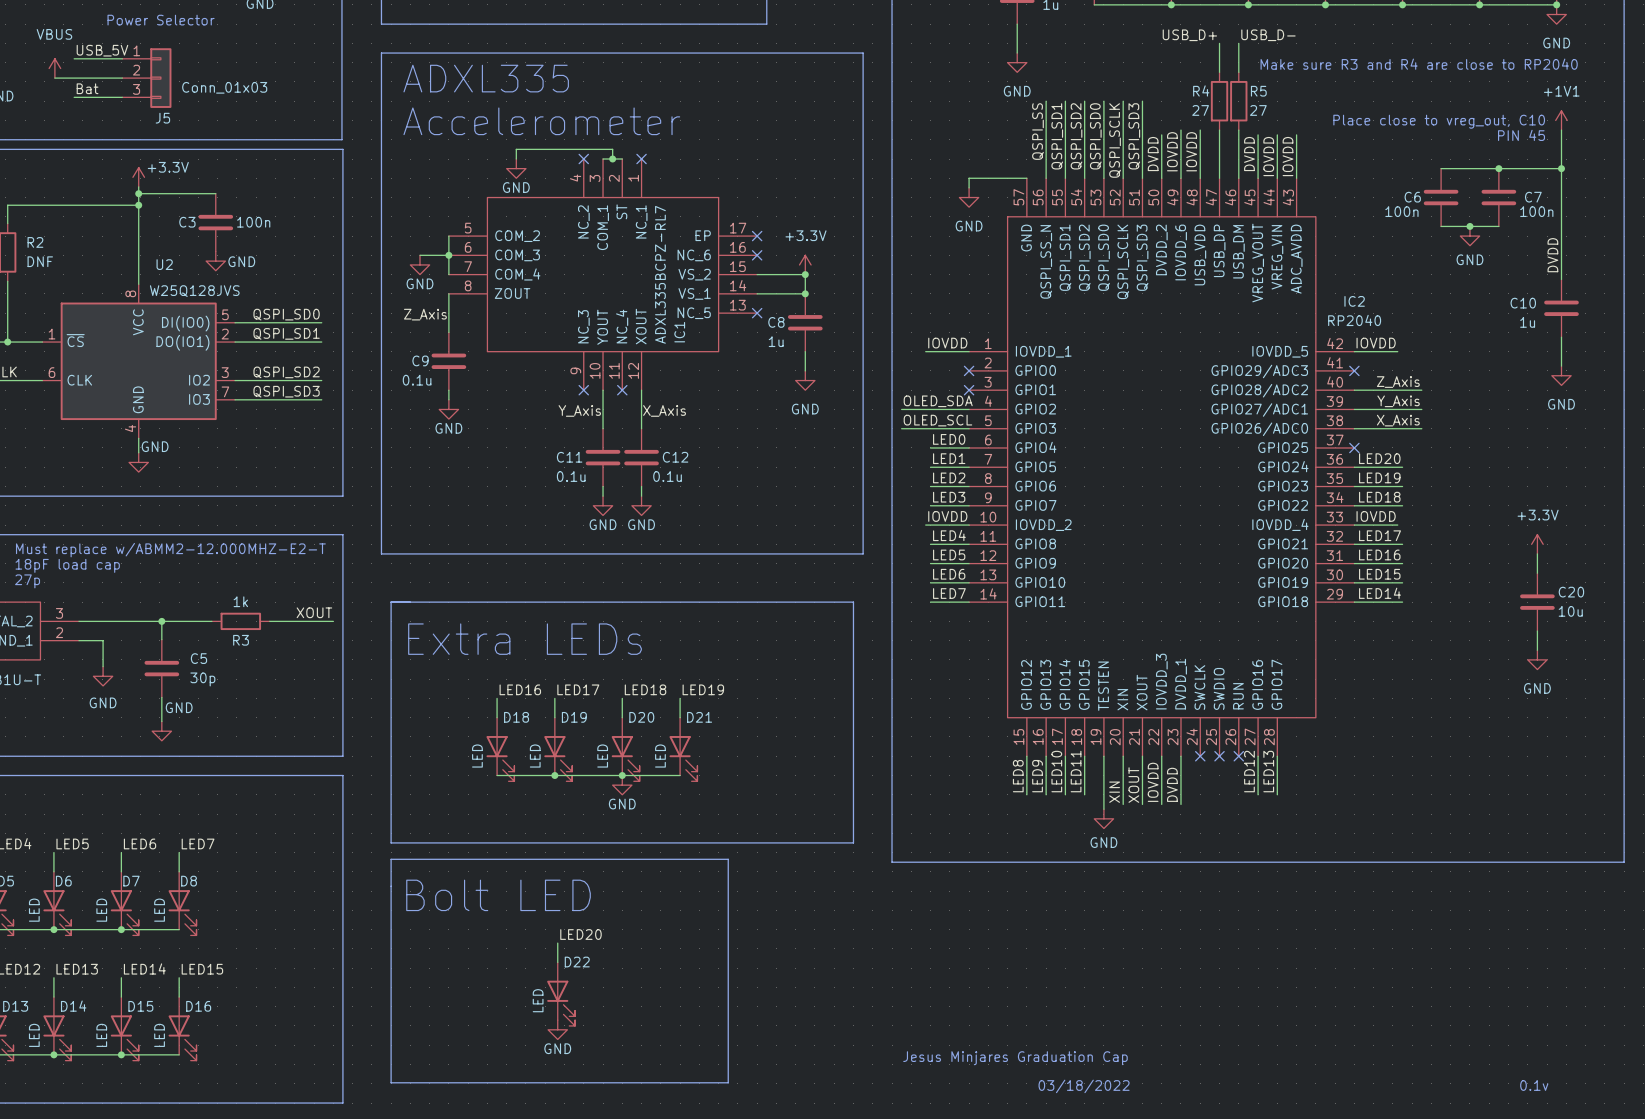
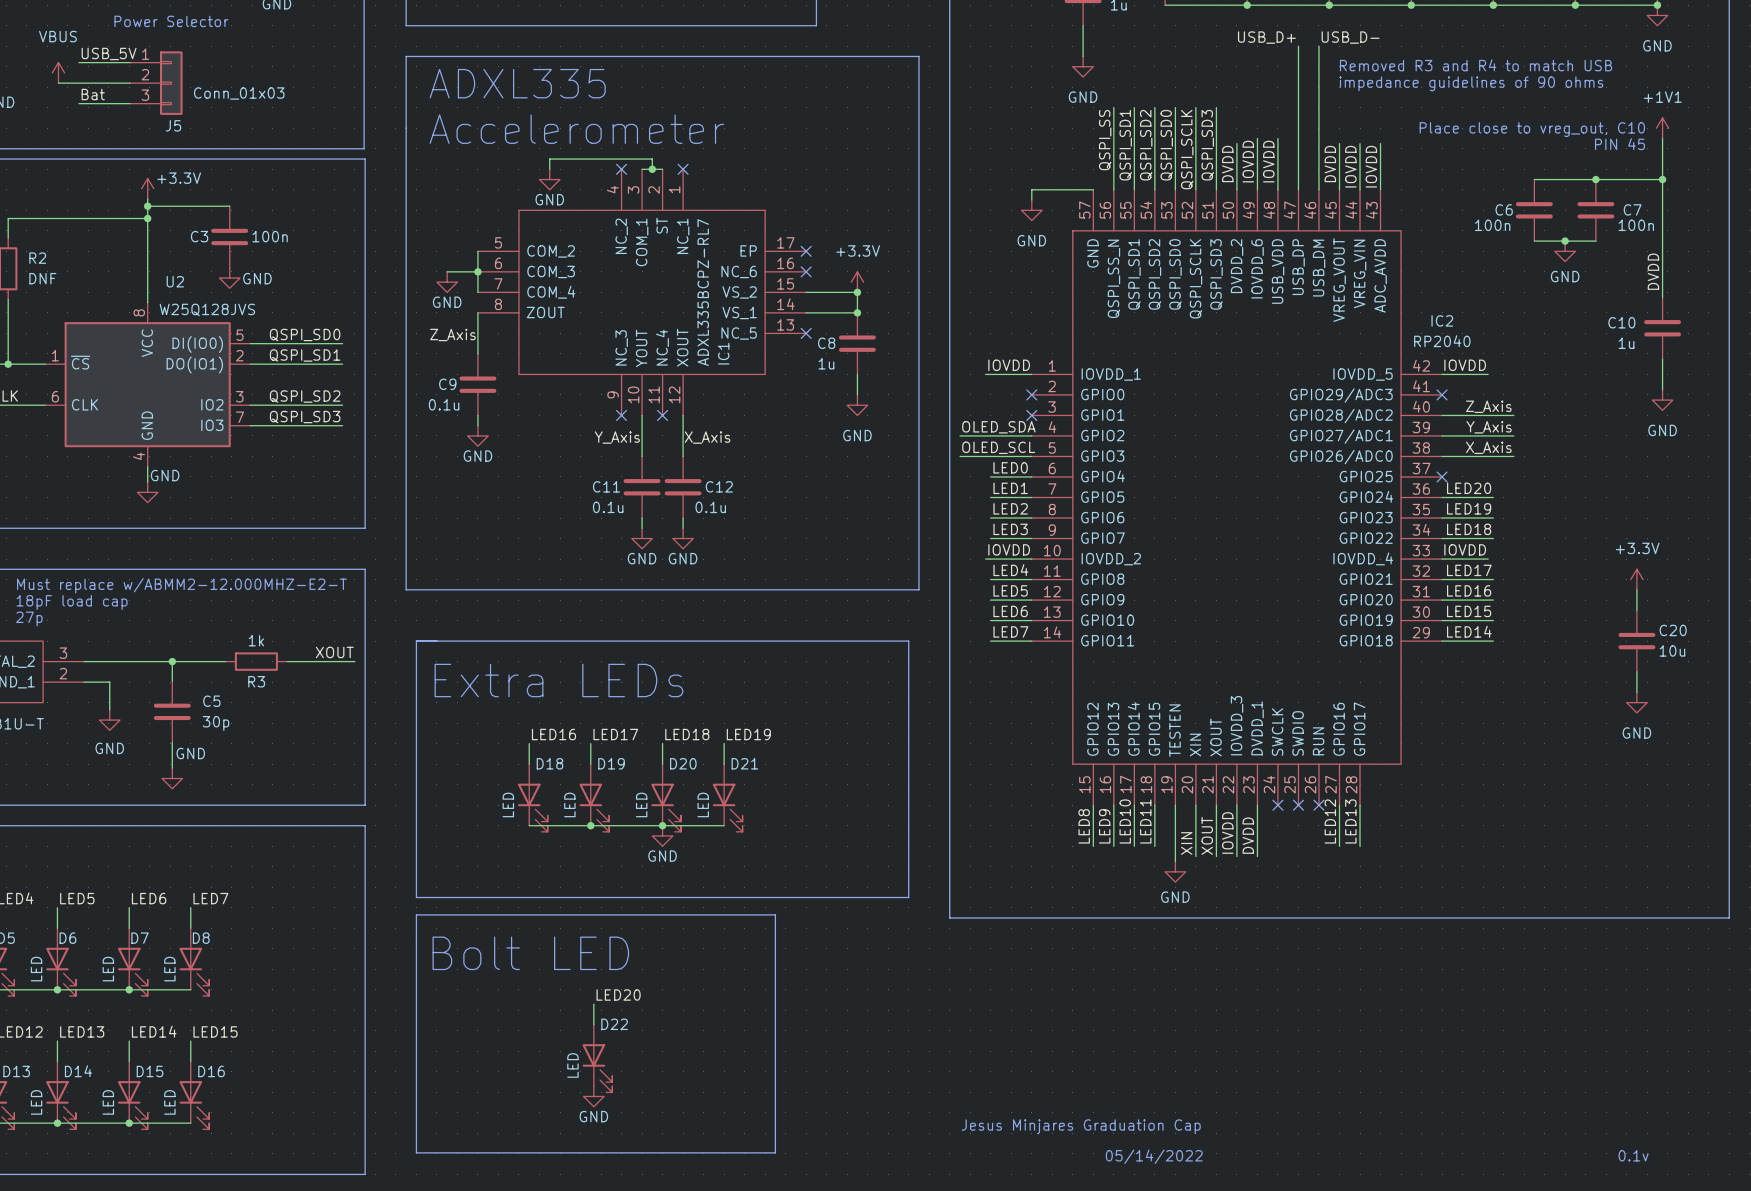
text: Make sure R3 and R4 are close to RP2040 (1419, 64) -> Removed R3 and R4 to match USB (1476, 65)
wire: none -> (1298, 76) (1298, 138)
wire: none -> (1318, 76) (1318, 138)
text: none -> impedance guidelines of 90 ohms (1471, 83)
R4: 27 (1219, 101) -> none
R5: 27 (1238, 101) -> none
text: 03/18/2022 (1084, 1086) -> 05/14/2022 (1154, 1156)

